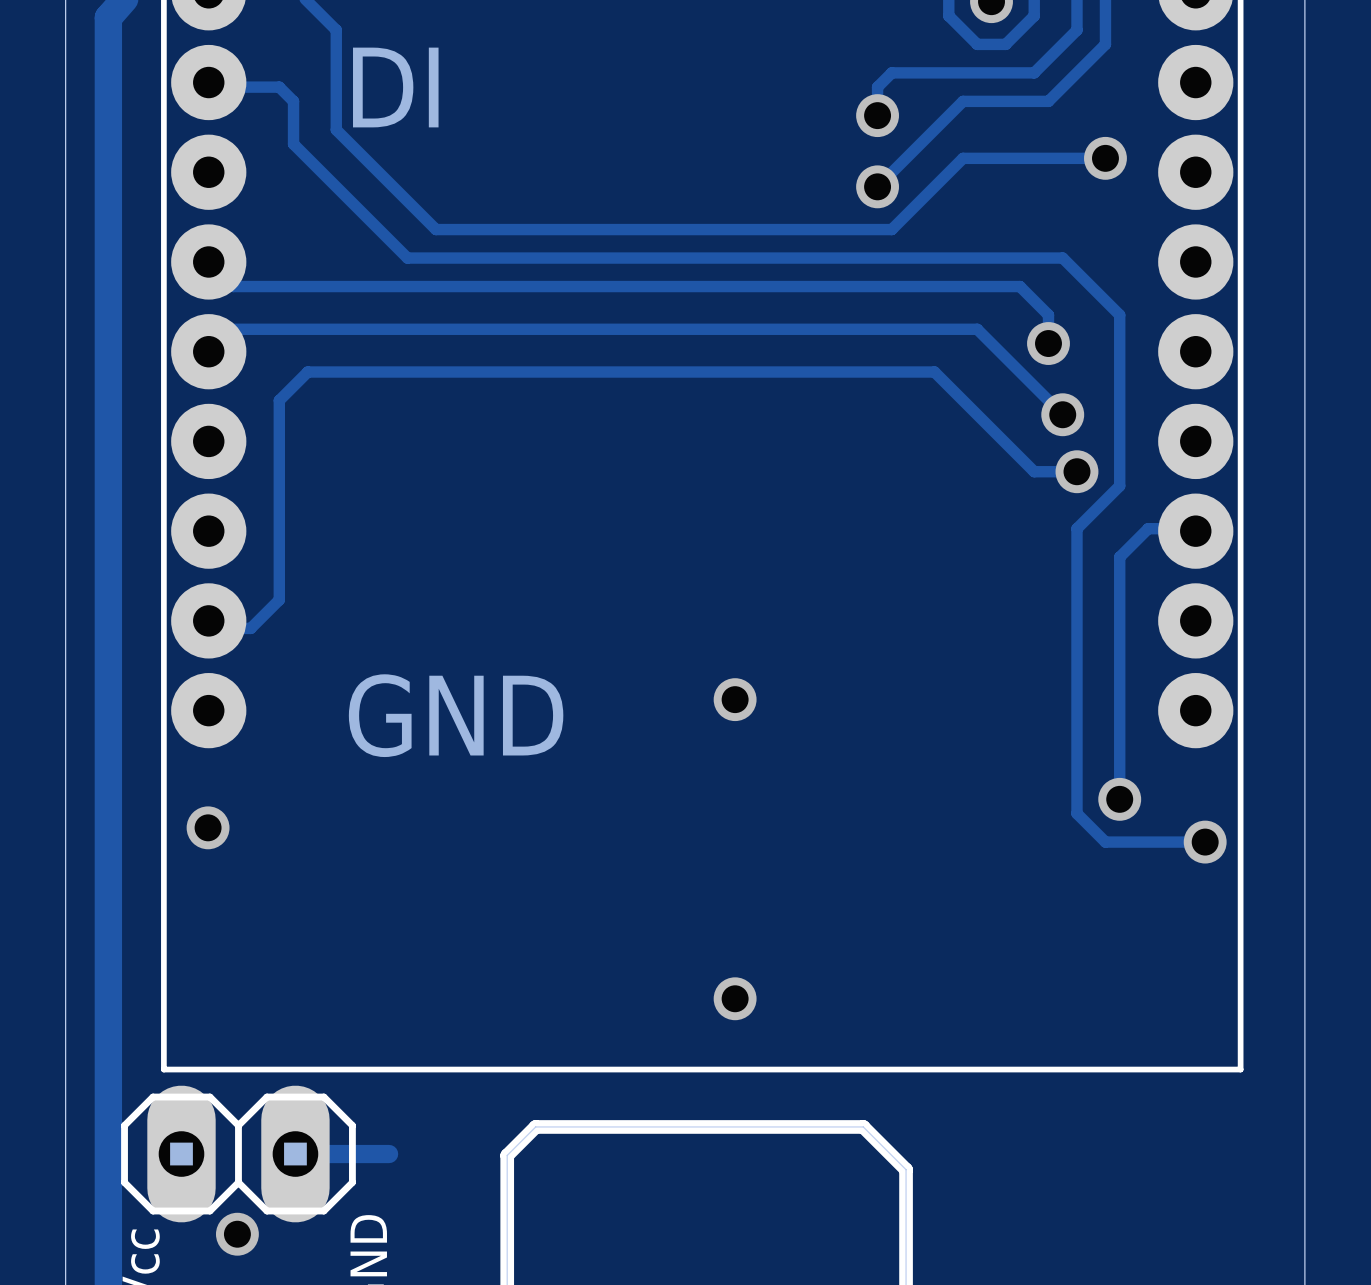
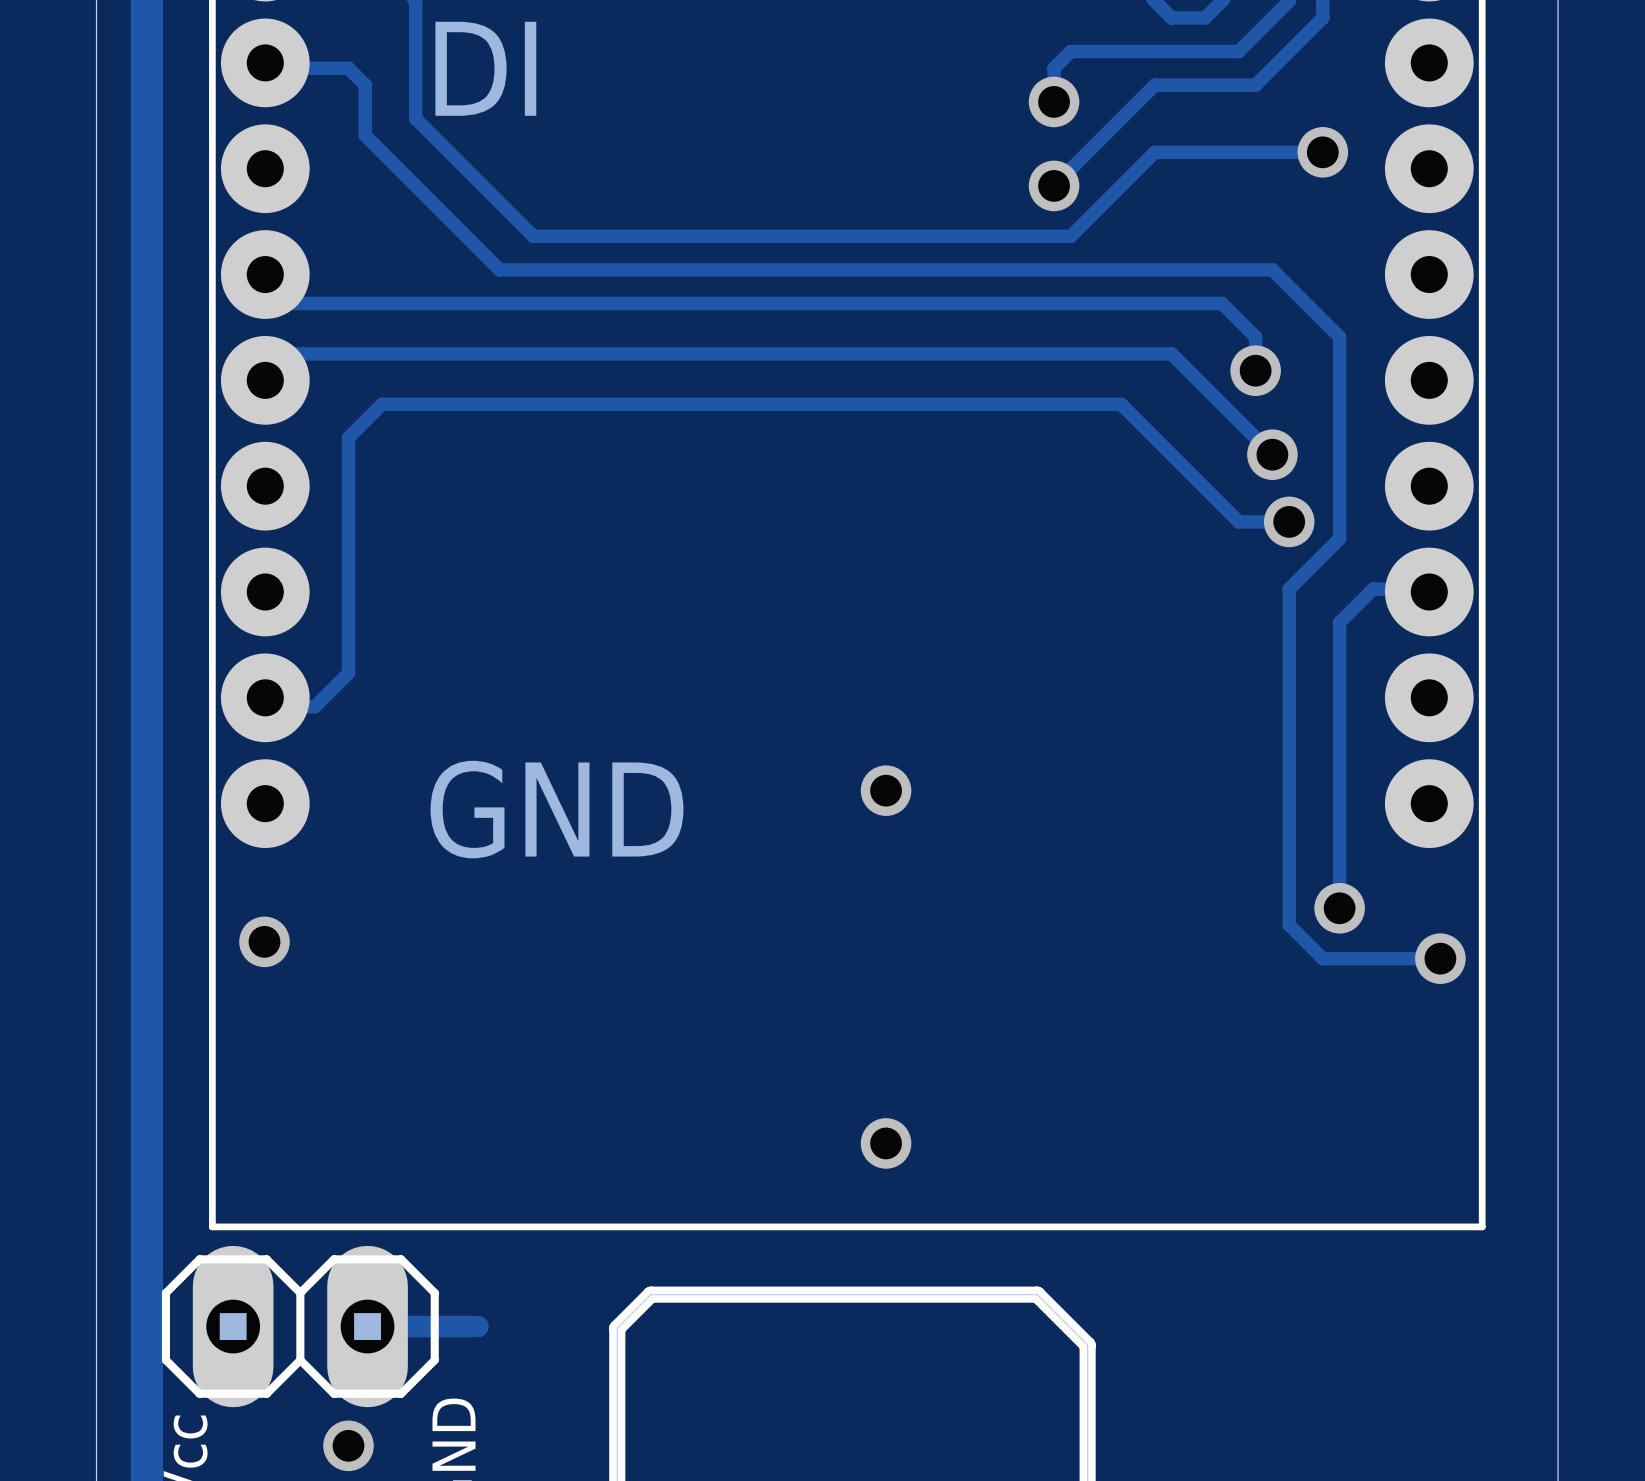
via position: (237, 1234) -> (348, 1445)

